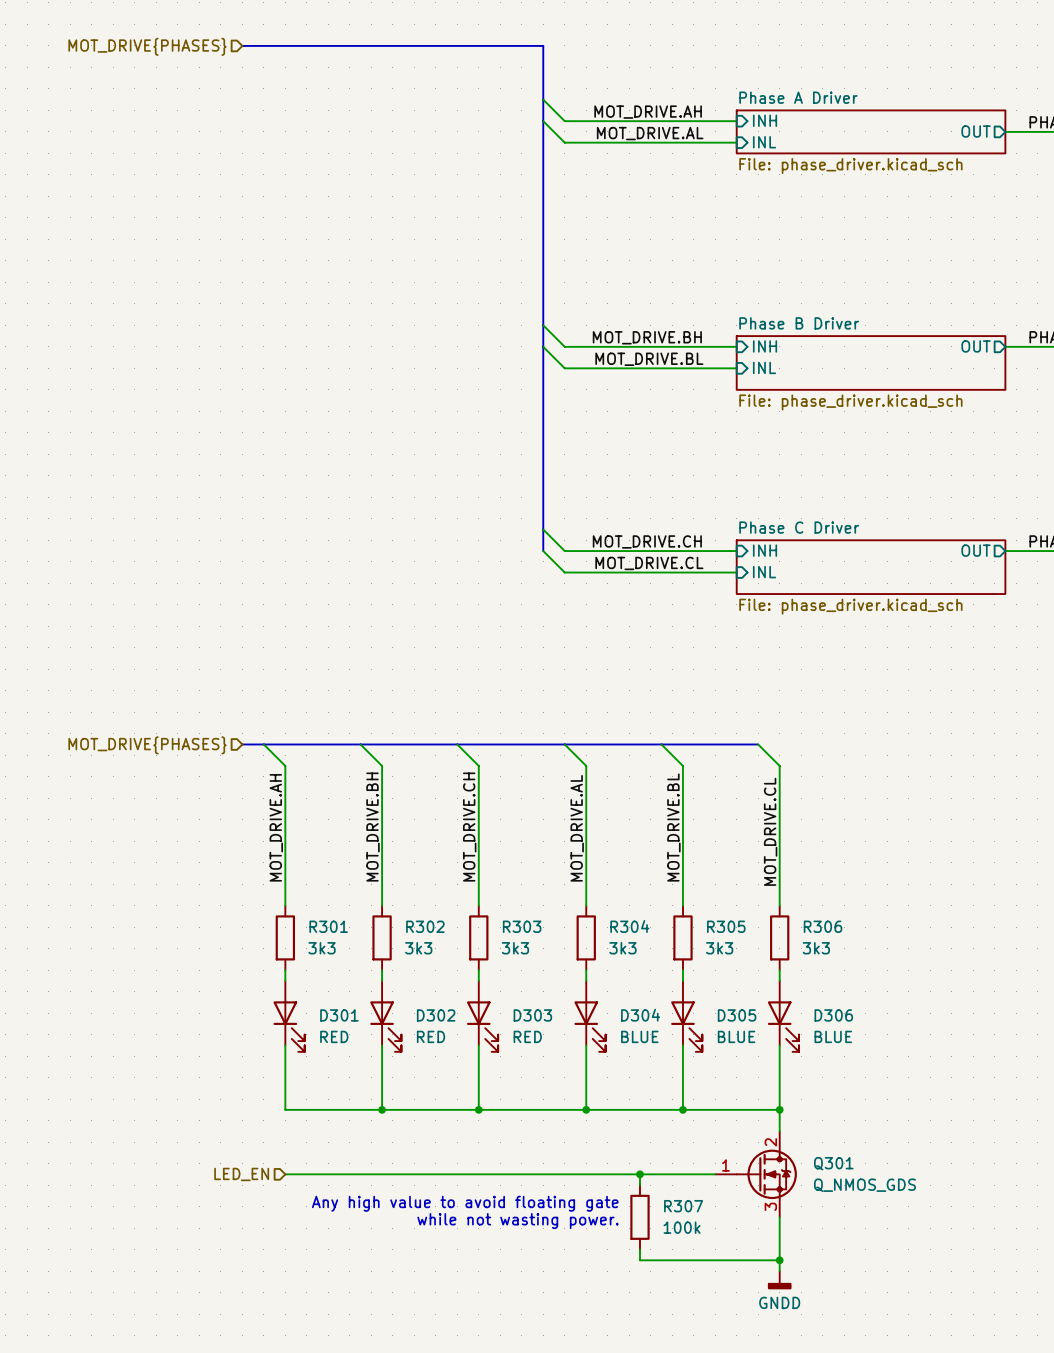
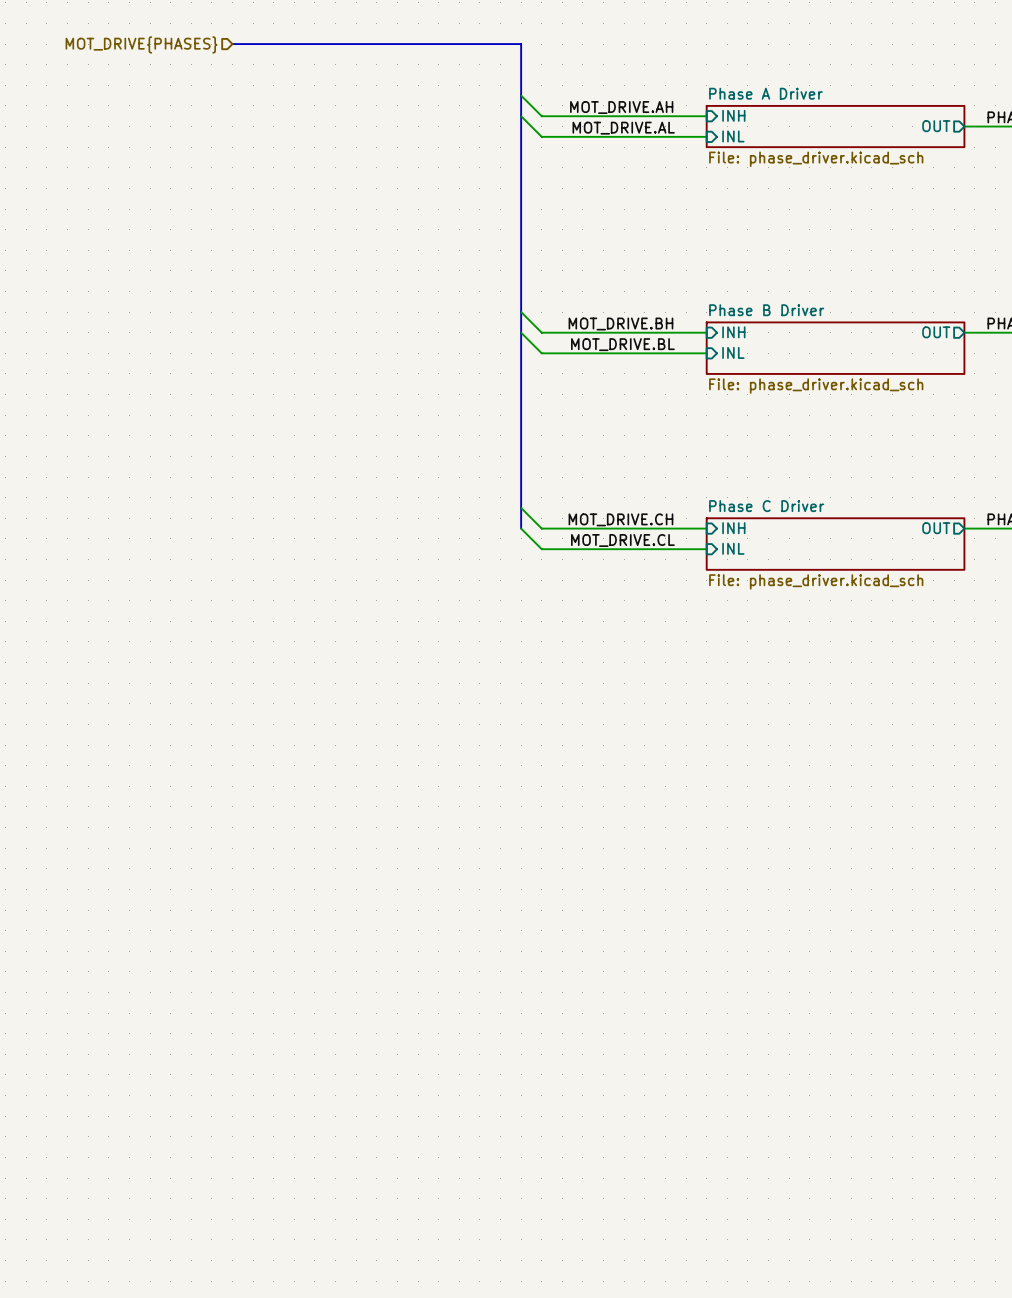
bus: (242, 744) (758, 744) -> none
wire: (263, 744) (285, 765) (285, 905) -> none
wire: (360, 744) (382, 765) (382, 905) -> none
wire: (457, 744) (478, 765) (478, 905) -> none
wire: (564, 744) (586, 765) (586, 905) -> none
wire: (661, 744) (682, 765) (682, 905) -> none
wire: (758, 744) (779, 765) (779, 905) -> none
hierarchical label: MOT_DRIVE{PHASES} (147, 745) -> none
label: MOT_DRIVE.AH (276, 827) -> none
label: MOT_DRIVE.BH (372, 827) -> none
label: MOT_DRIVE.CH (469, 827) -> none
label: MOT_DRIVE.BL (673, 827) -> none
label: MOT_DRIVE.AL (577, 828) -> none
label: MOT_DRIVE.CL (770, 831) -> none
R301: 3k3 (285, 937) -> none
R302: 3k3 (382, 937) -> none
R303: 3k3 (478, 937) -> none
R304: 3k3 (586, 937) -> none
R305: 3k3 (682, 937) -> none
R306: 3k3 (779, 937) -> none
wire: (285, 970) (285, 980) -> none
wire: (382, 970) (382, 980) -> none
wire: (478, 970) (478, 980) -> none
wire: (586, 970) (586, 980) -> none
wire: (682, 970) (682, 980) -> none
wire: (779, 970) (779, 980) -> none
D301: RED (289, 1016) -> none
D302: RED (385, 1016) -> none
D303: RED (482, 1016) -> none
D304: BLUE (590, 1016) -> none
D305: BLUE (686, 1016) -> none
D306: BLUE (783, 1016) -> none
wire: (285, 1045) (285, 1109) (779, 1109) -> none
wire: (382, 1045) (382, 1109) -> none
wire: (478, 1045) (478, 1109) -> none
wire: (586, 1045) (586, 1109) -> none
wire: (682, 1045) (682, 1109) -> none
wire: (779, 1045) (779, 1131) -> none
junction: (382, 1109) -> none
junction: (478, 1109) -> none
junction: (586, 1109) -> none
junction: (682, 1109) -> none
junction: (779, 1109) -> none
hierarchical label: LED_EN (241, 1174) -> none
wire: (285, 1174) (715, 1174) -> none
wire: (639, 1174) (639, 1185) -> none
junction: (639, 1174) -> none
Q301: Q_NMOS_GDS (756, 1174) -> none
text: Any high value to avoid floating gate (465, 1203) -> none
R307: 100k (639, 1217) -> none
wire: (779, 1217) (779, 1271) -> none
text: while not wasting power. (517, 1221) -> none
wire: (639, 1249) (639, 1260) (779, 1260) -> none
junction: (779, 1260) -> none
power symbol: GNDD (779, 1280) -> none

